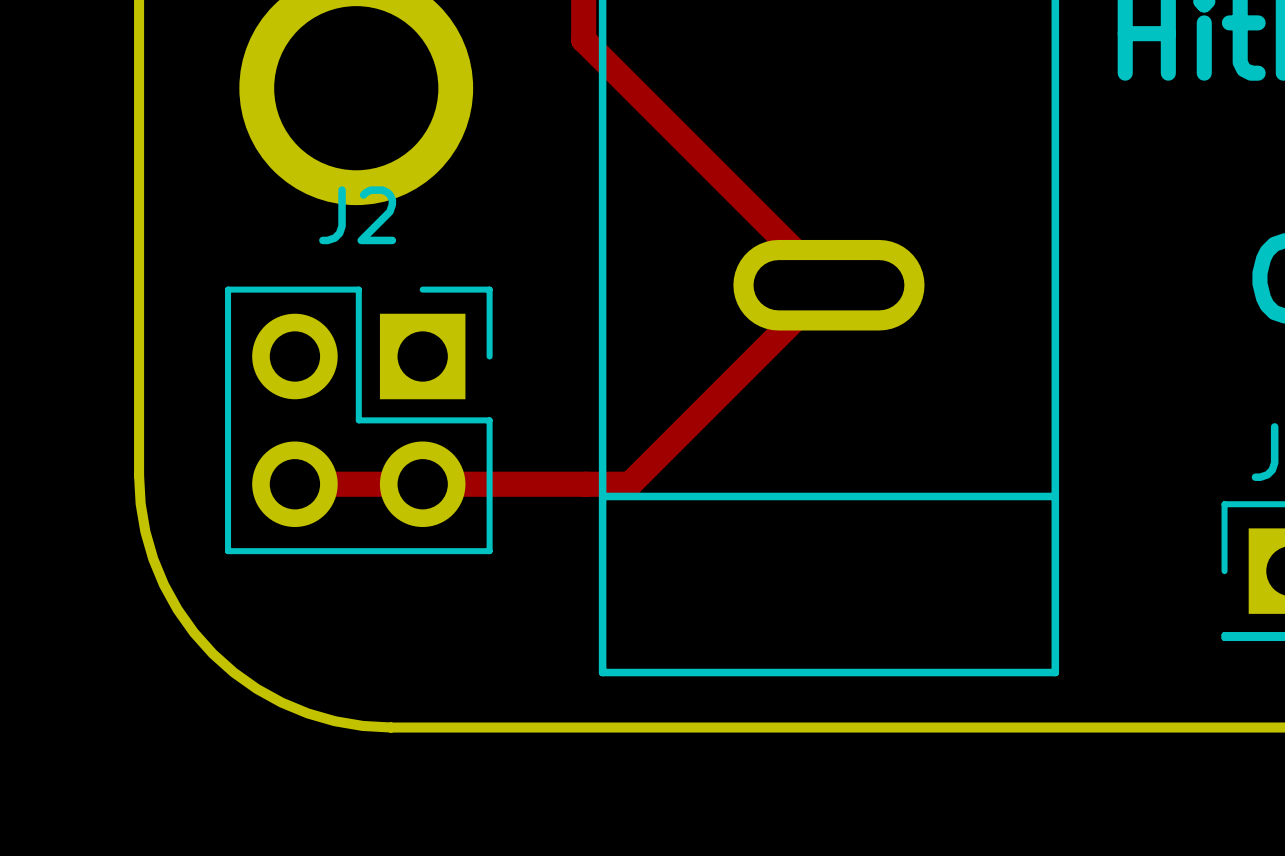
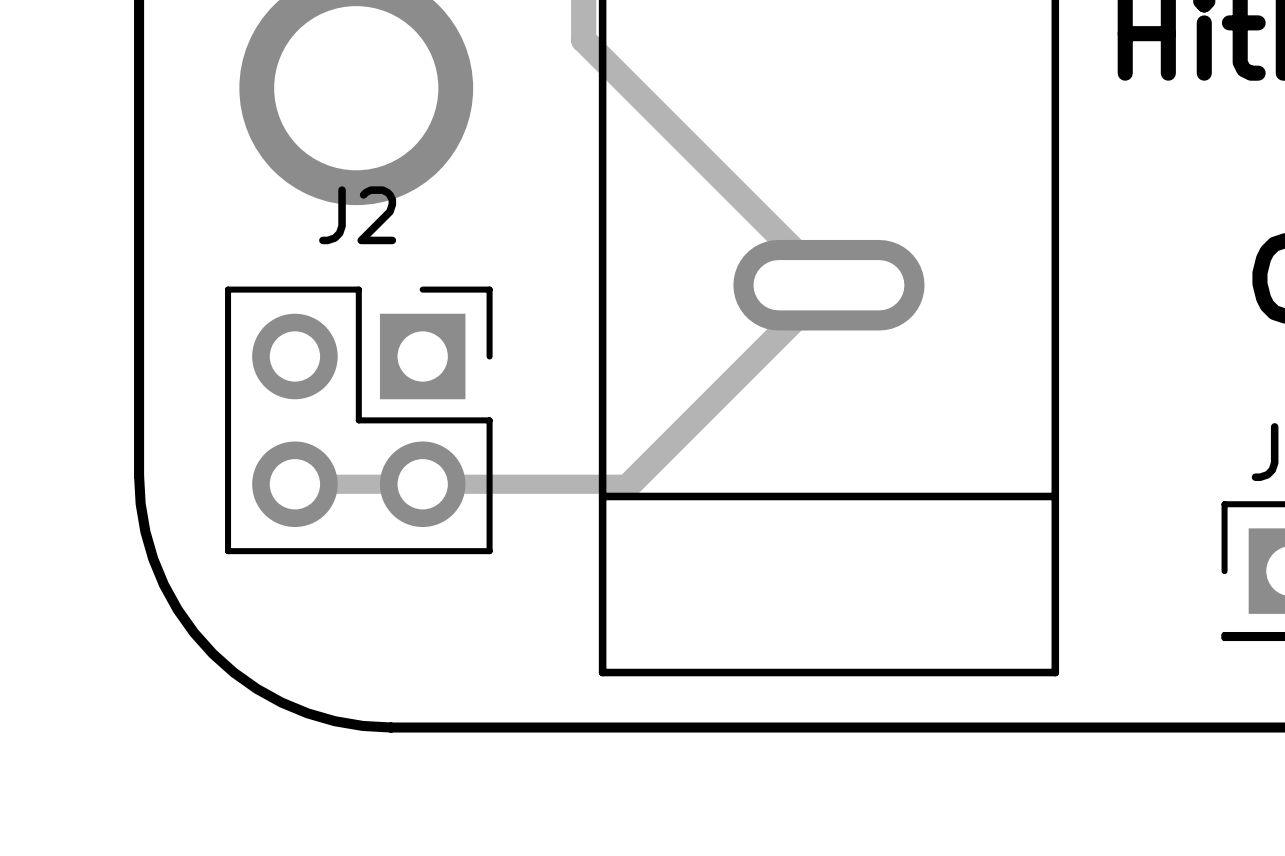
track width: thick (294, 484) (629, 484) -> thin (294, 484) (629, 484)

